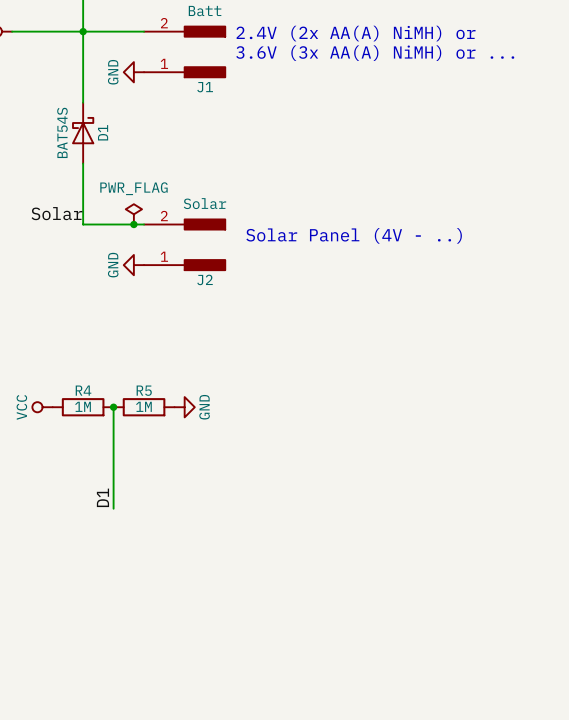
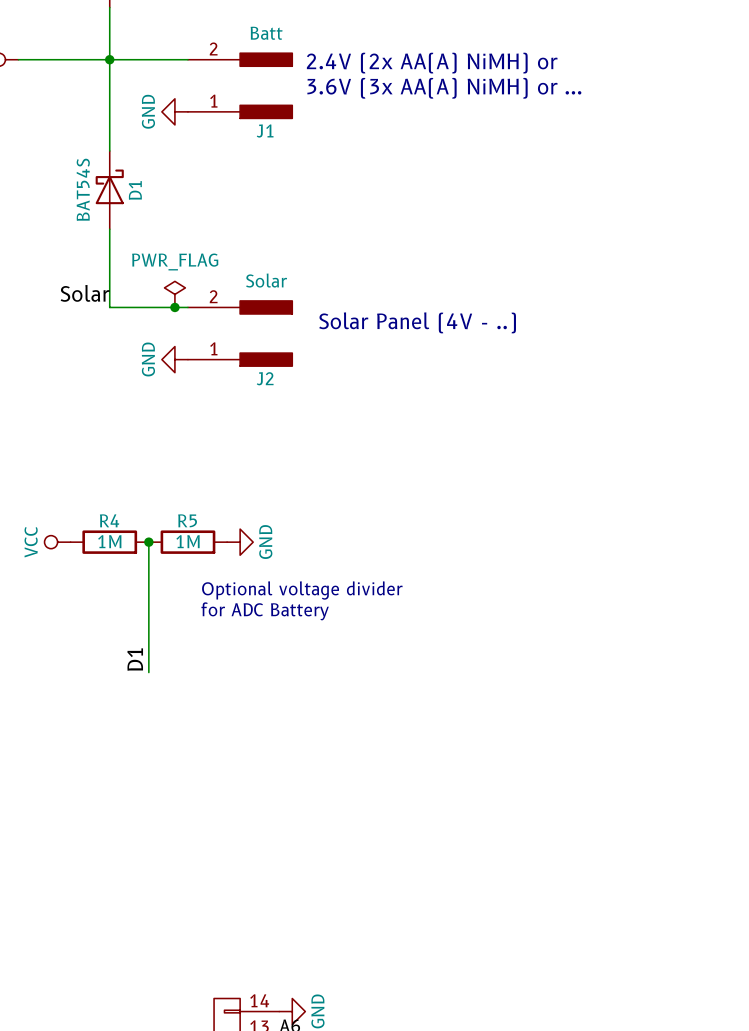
text: none -> Optional voltage divider (302, 590)
text: none -> for ADC Battery (265, 611)

